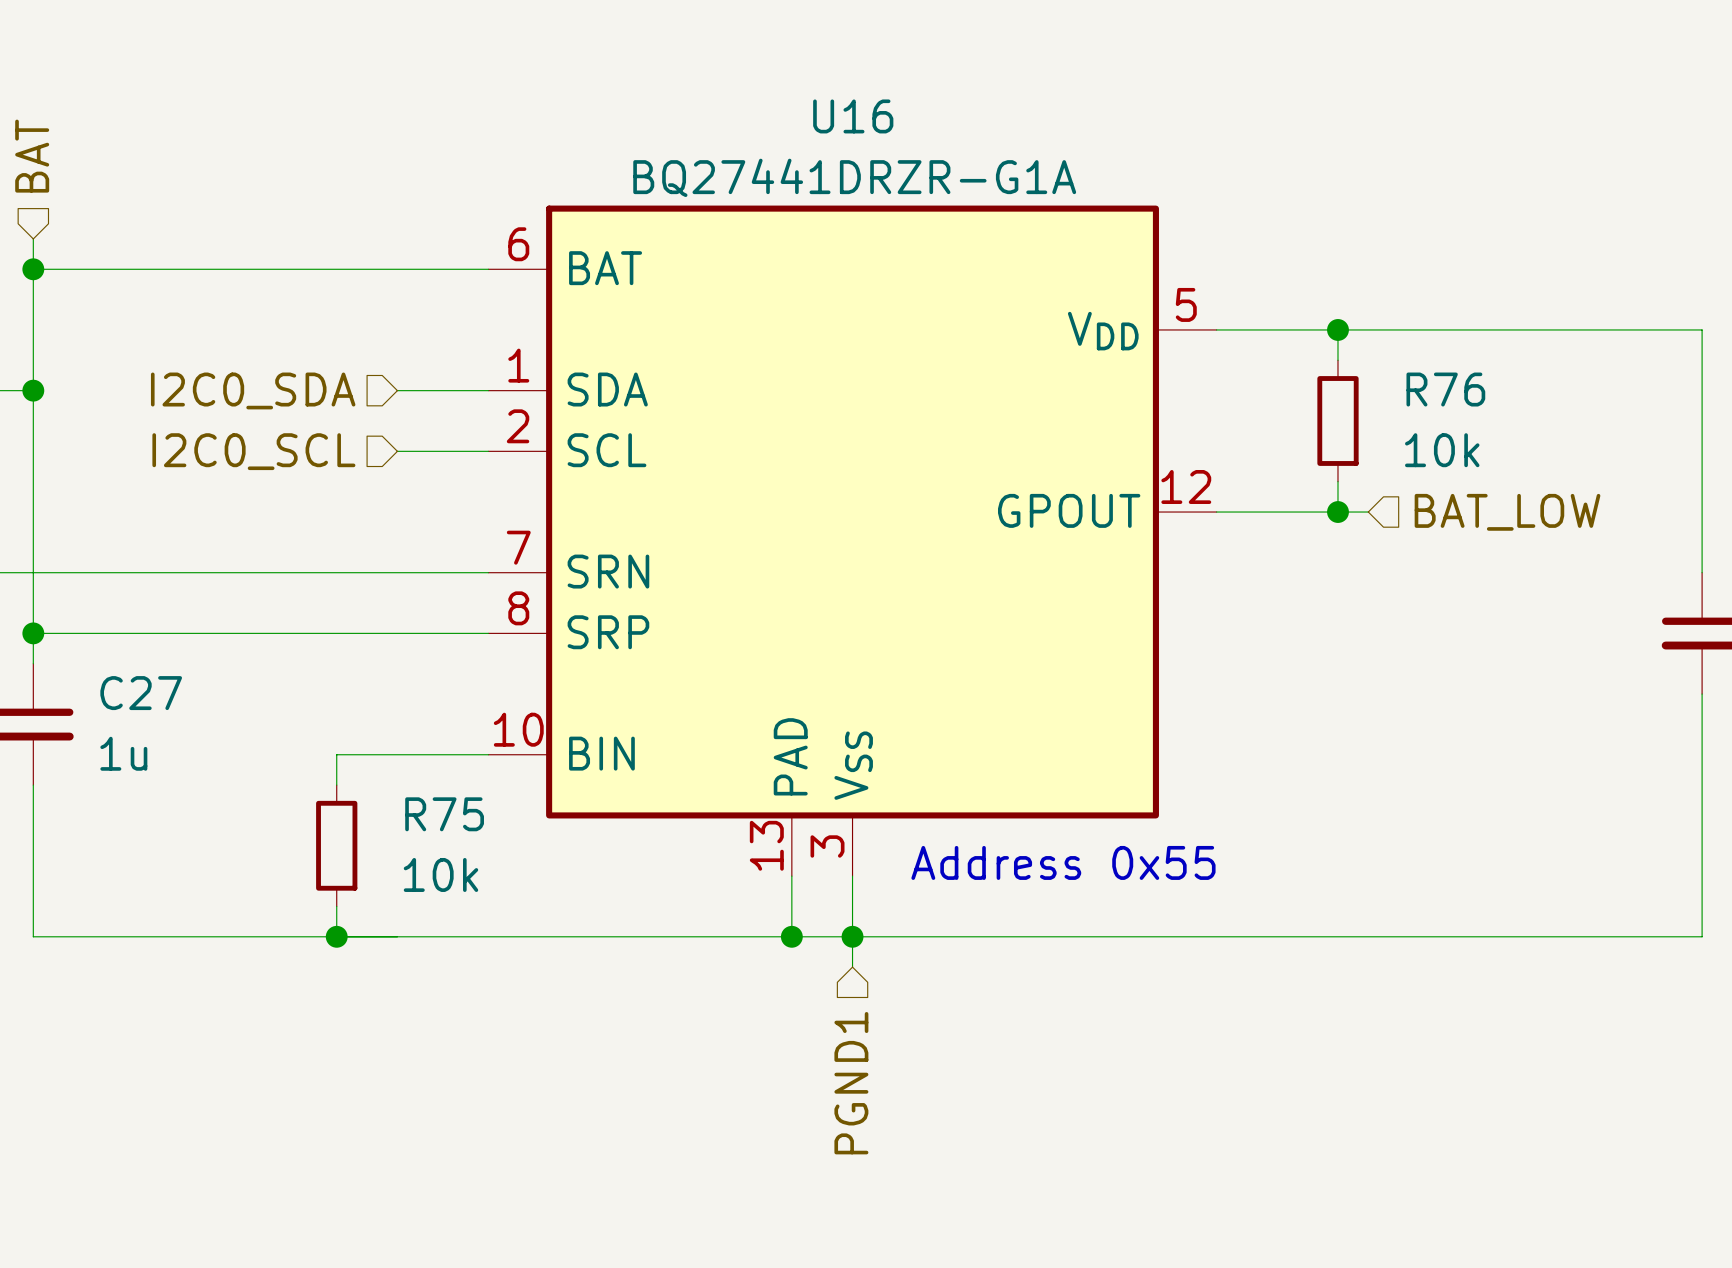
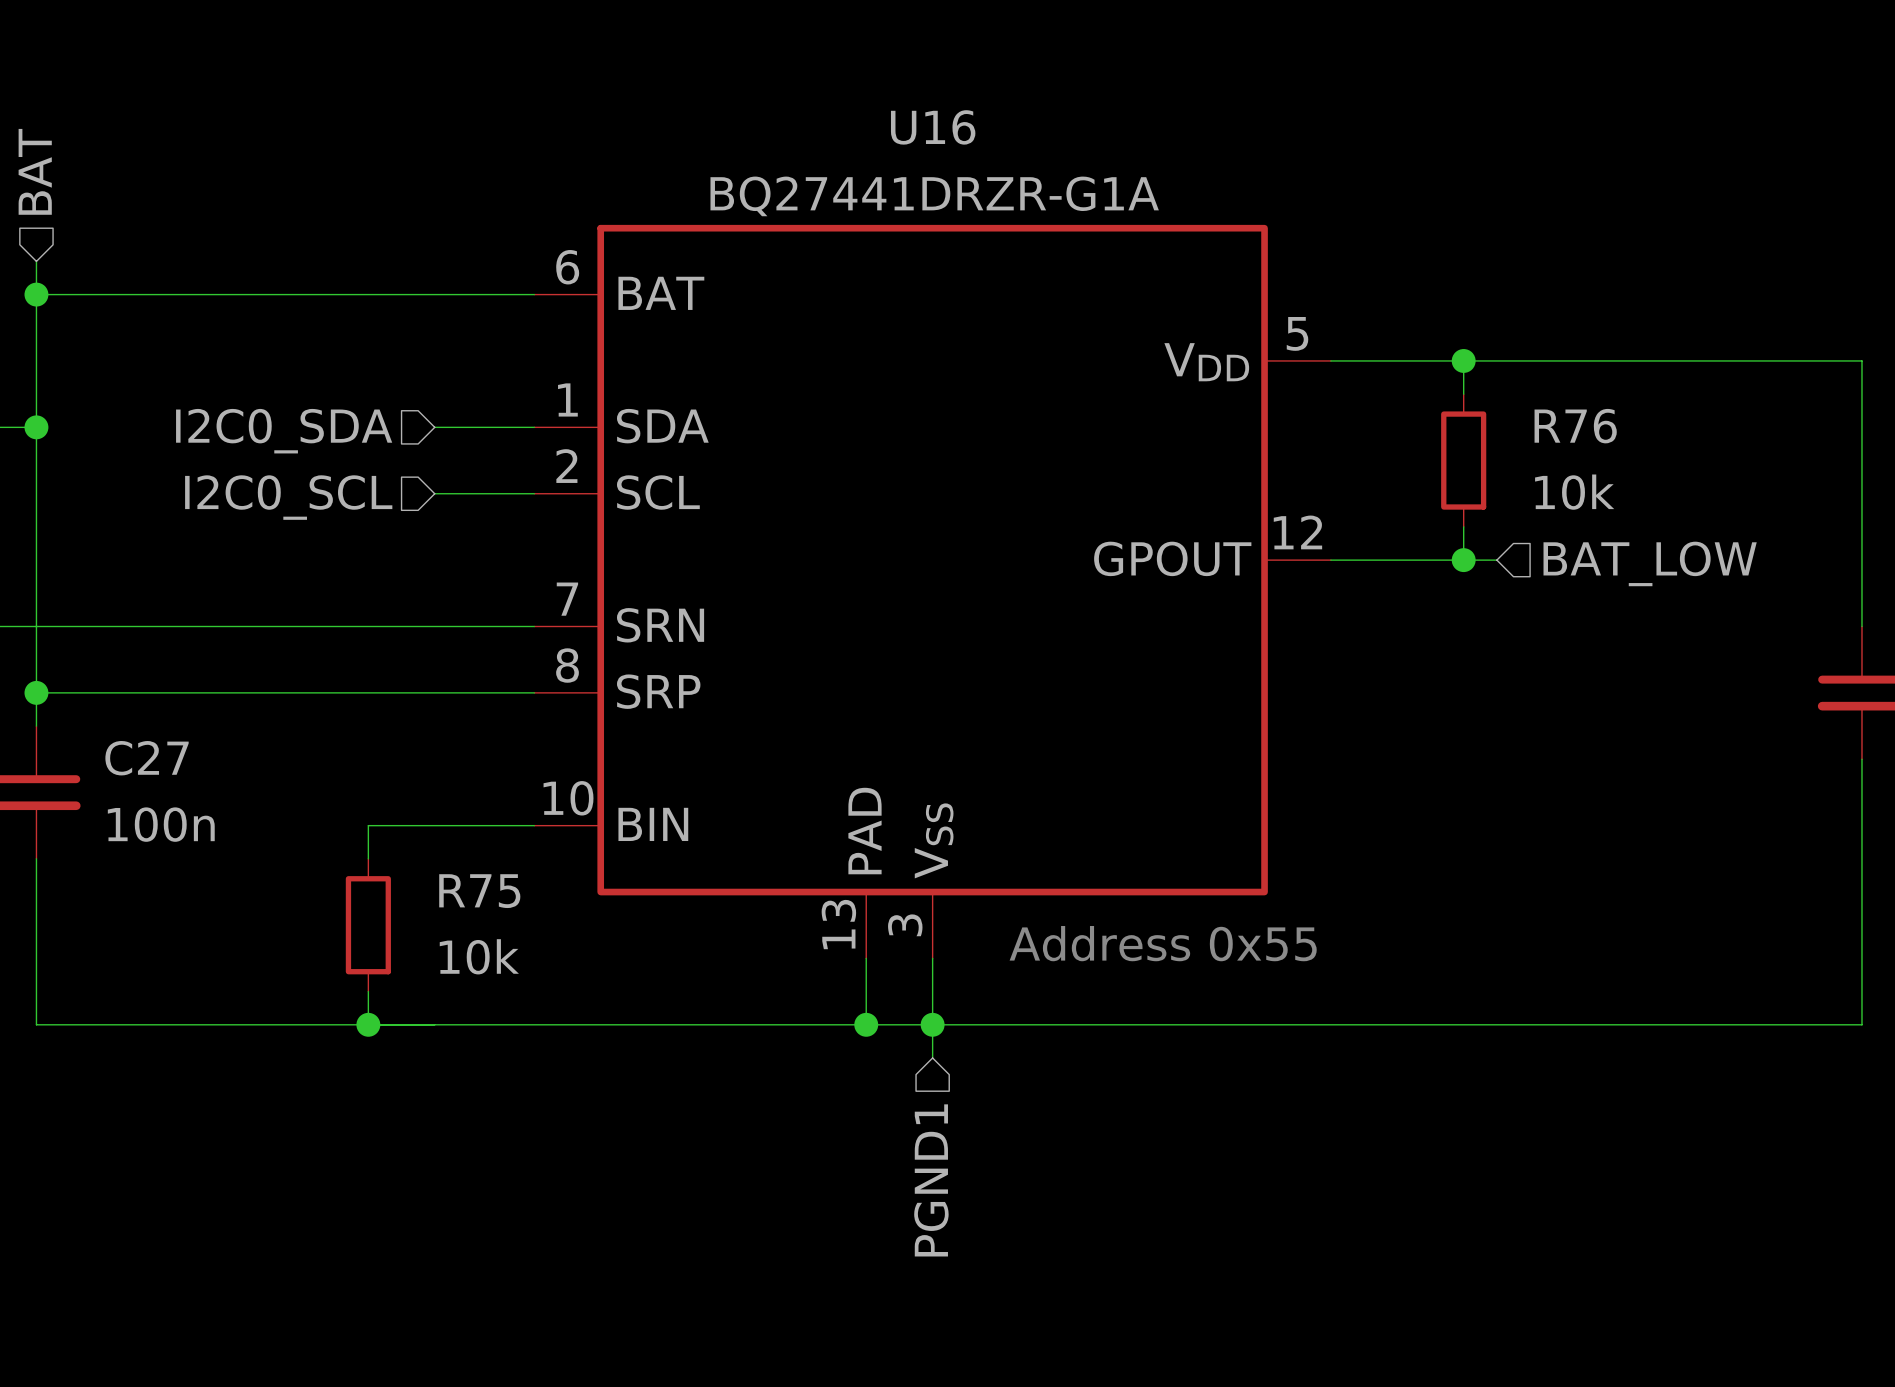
C27 value: 1u (123, 753) -> 100n (161, 824)

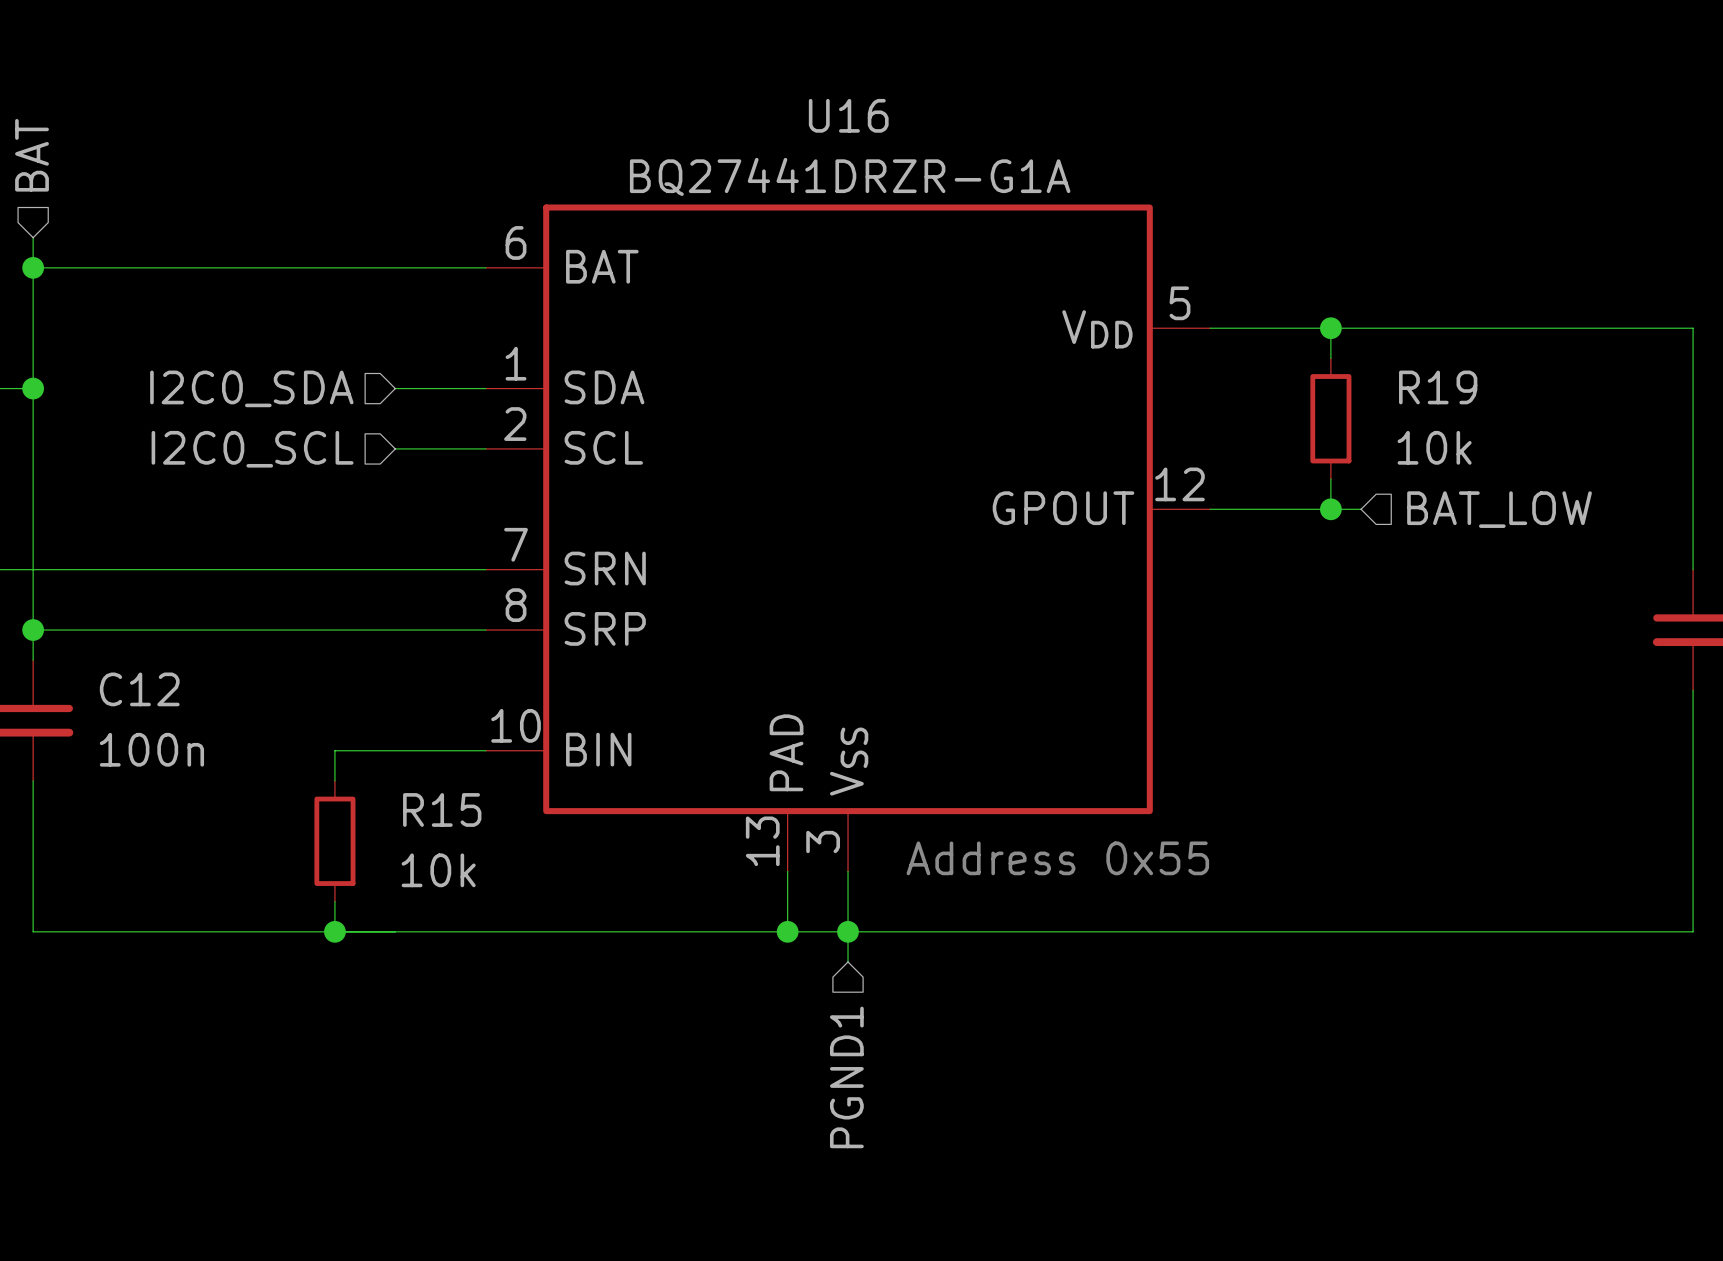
R76 name: R76 (1575, 426) -> R19 (1438, 387)
C27 name: C27 (147, 758) -> C12 (139, 689)
R75 name: R75 (479, 891) -> R15 (442, 809)

